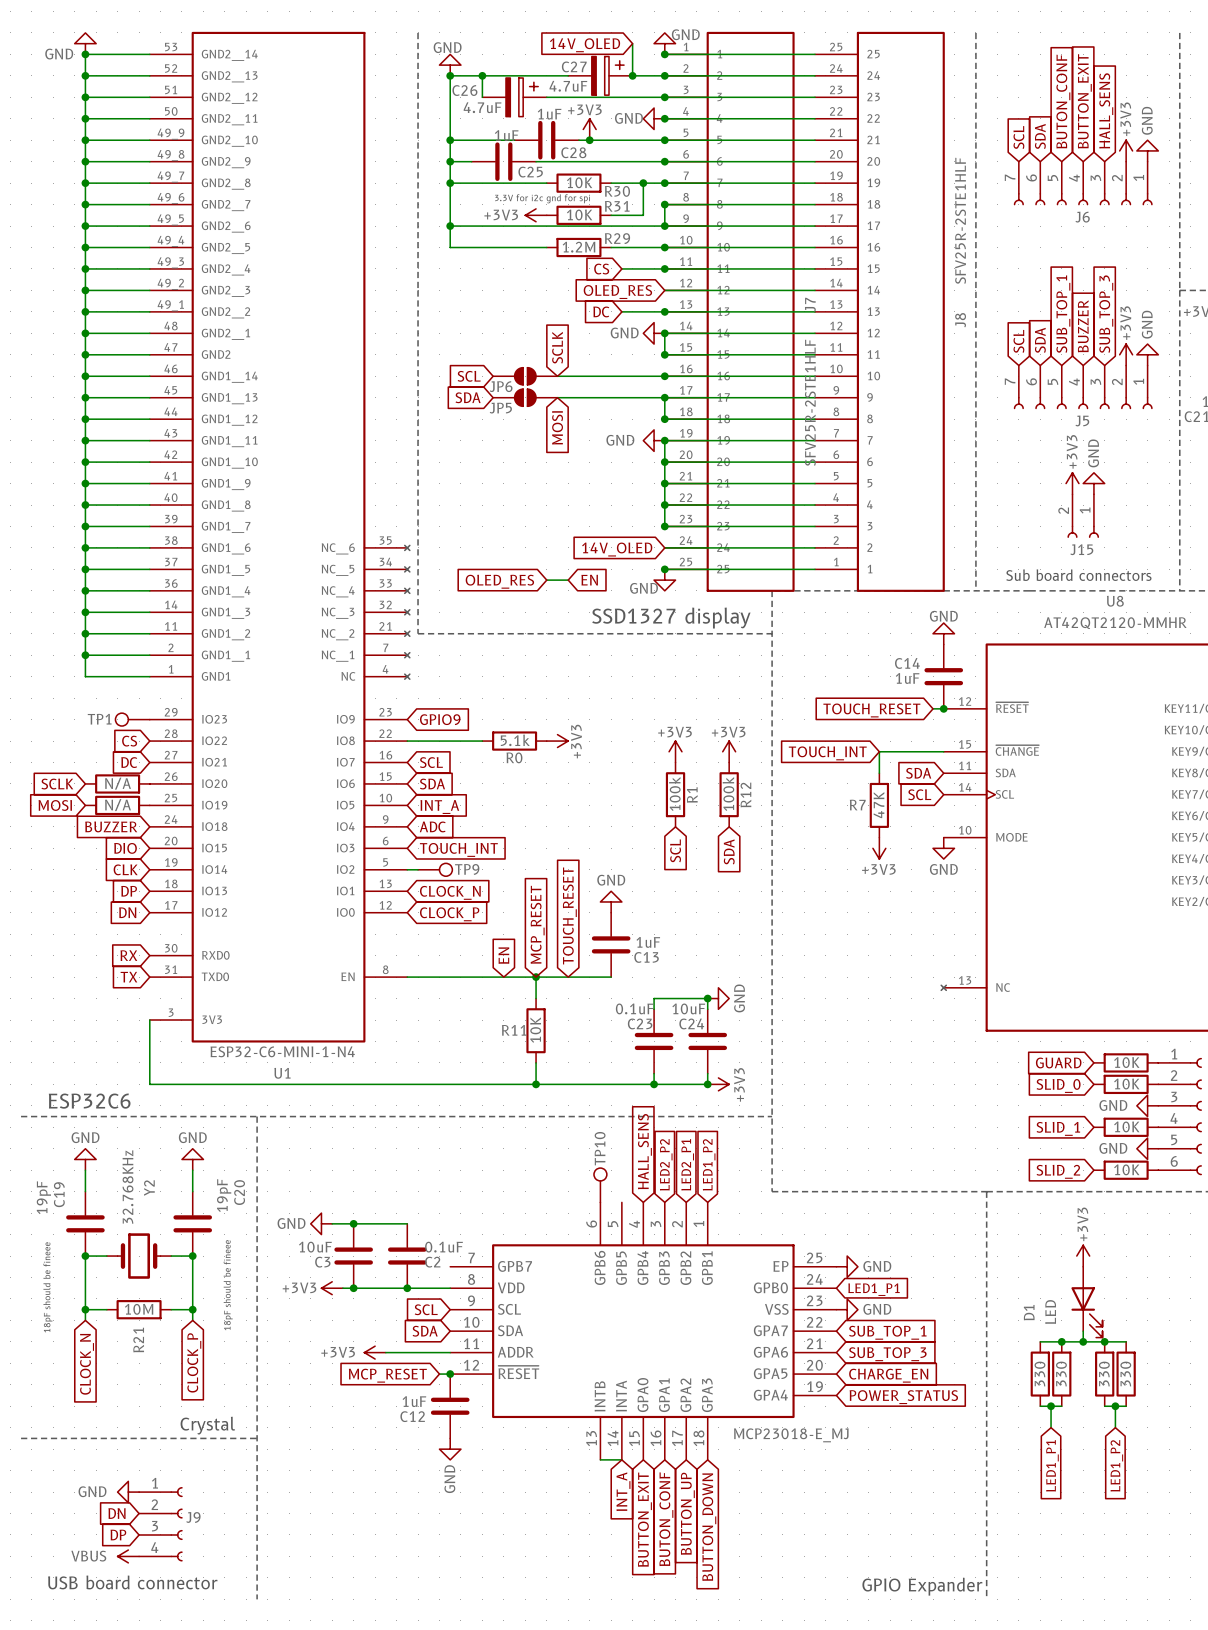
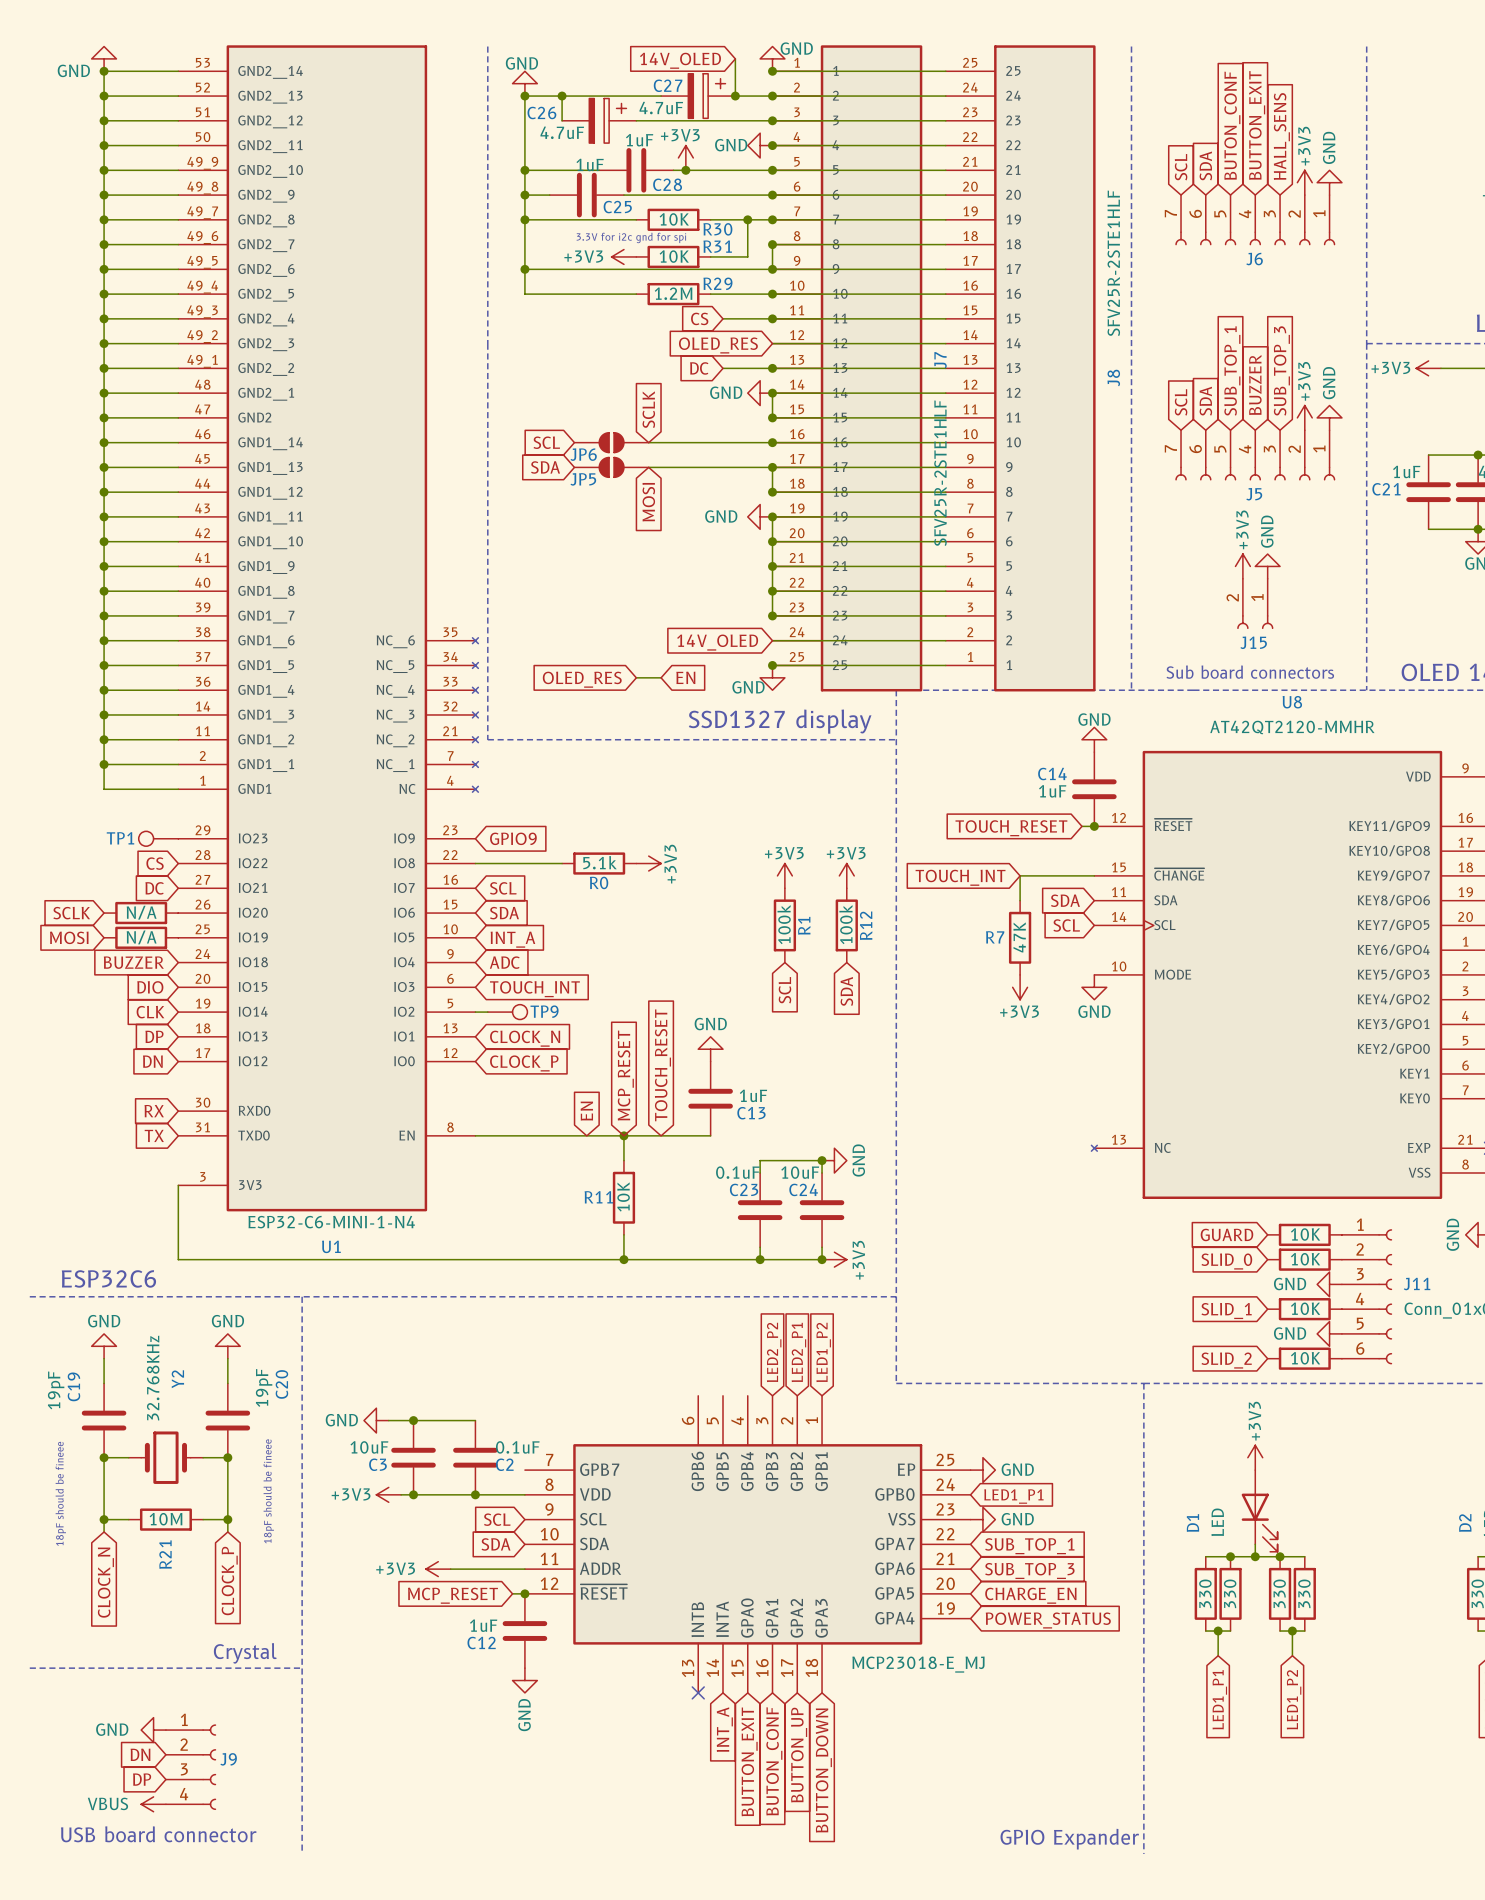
global label: HALL_SENS (644, 1151) -> none
TP10: (600, 1185) -> none
wire: (600, 1459) (621, 1459) -> none
no-connect mark: none -> (698, 1692)

